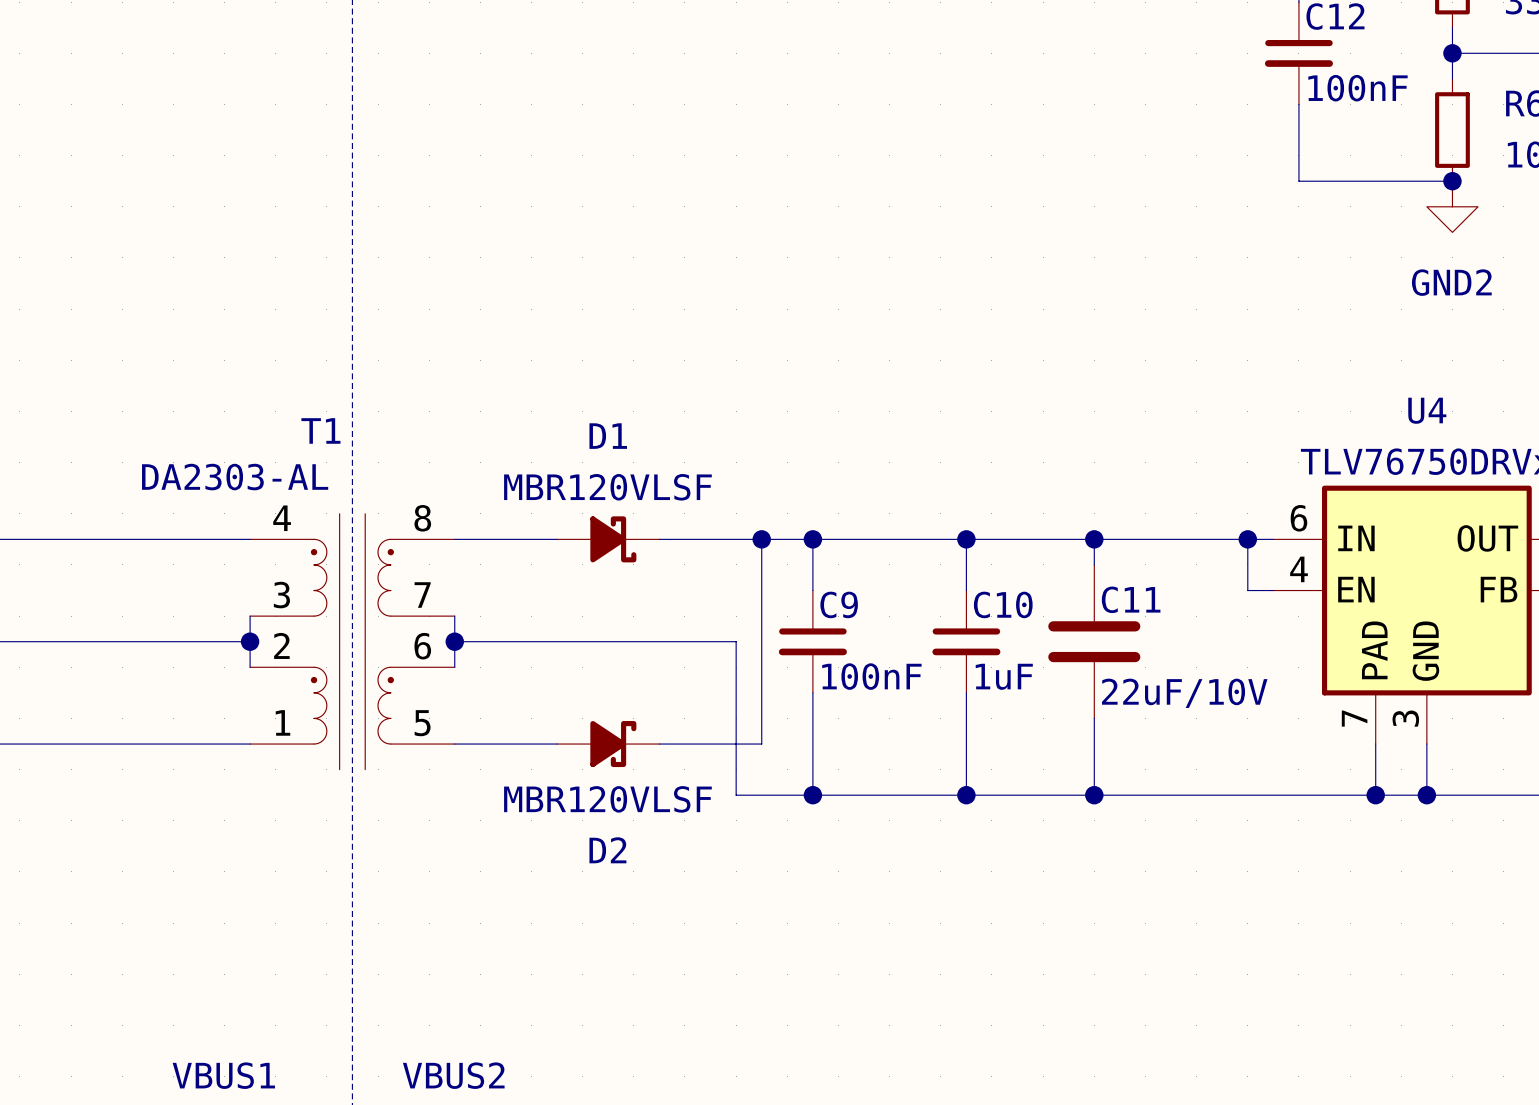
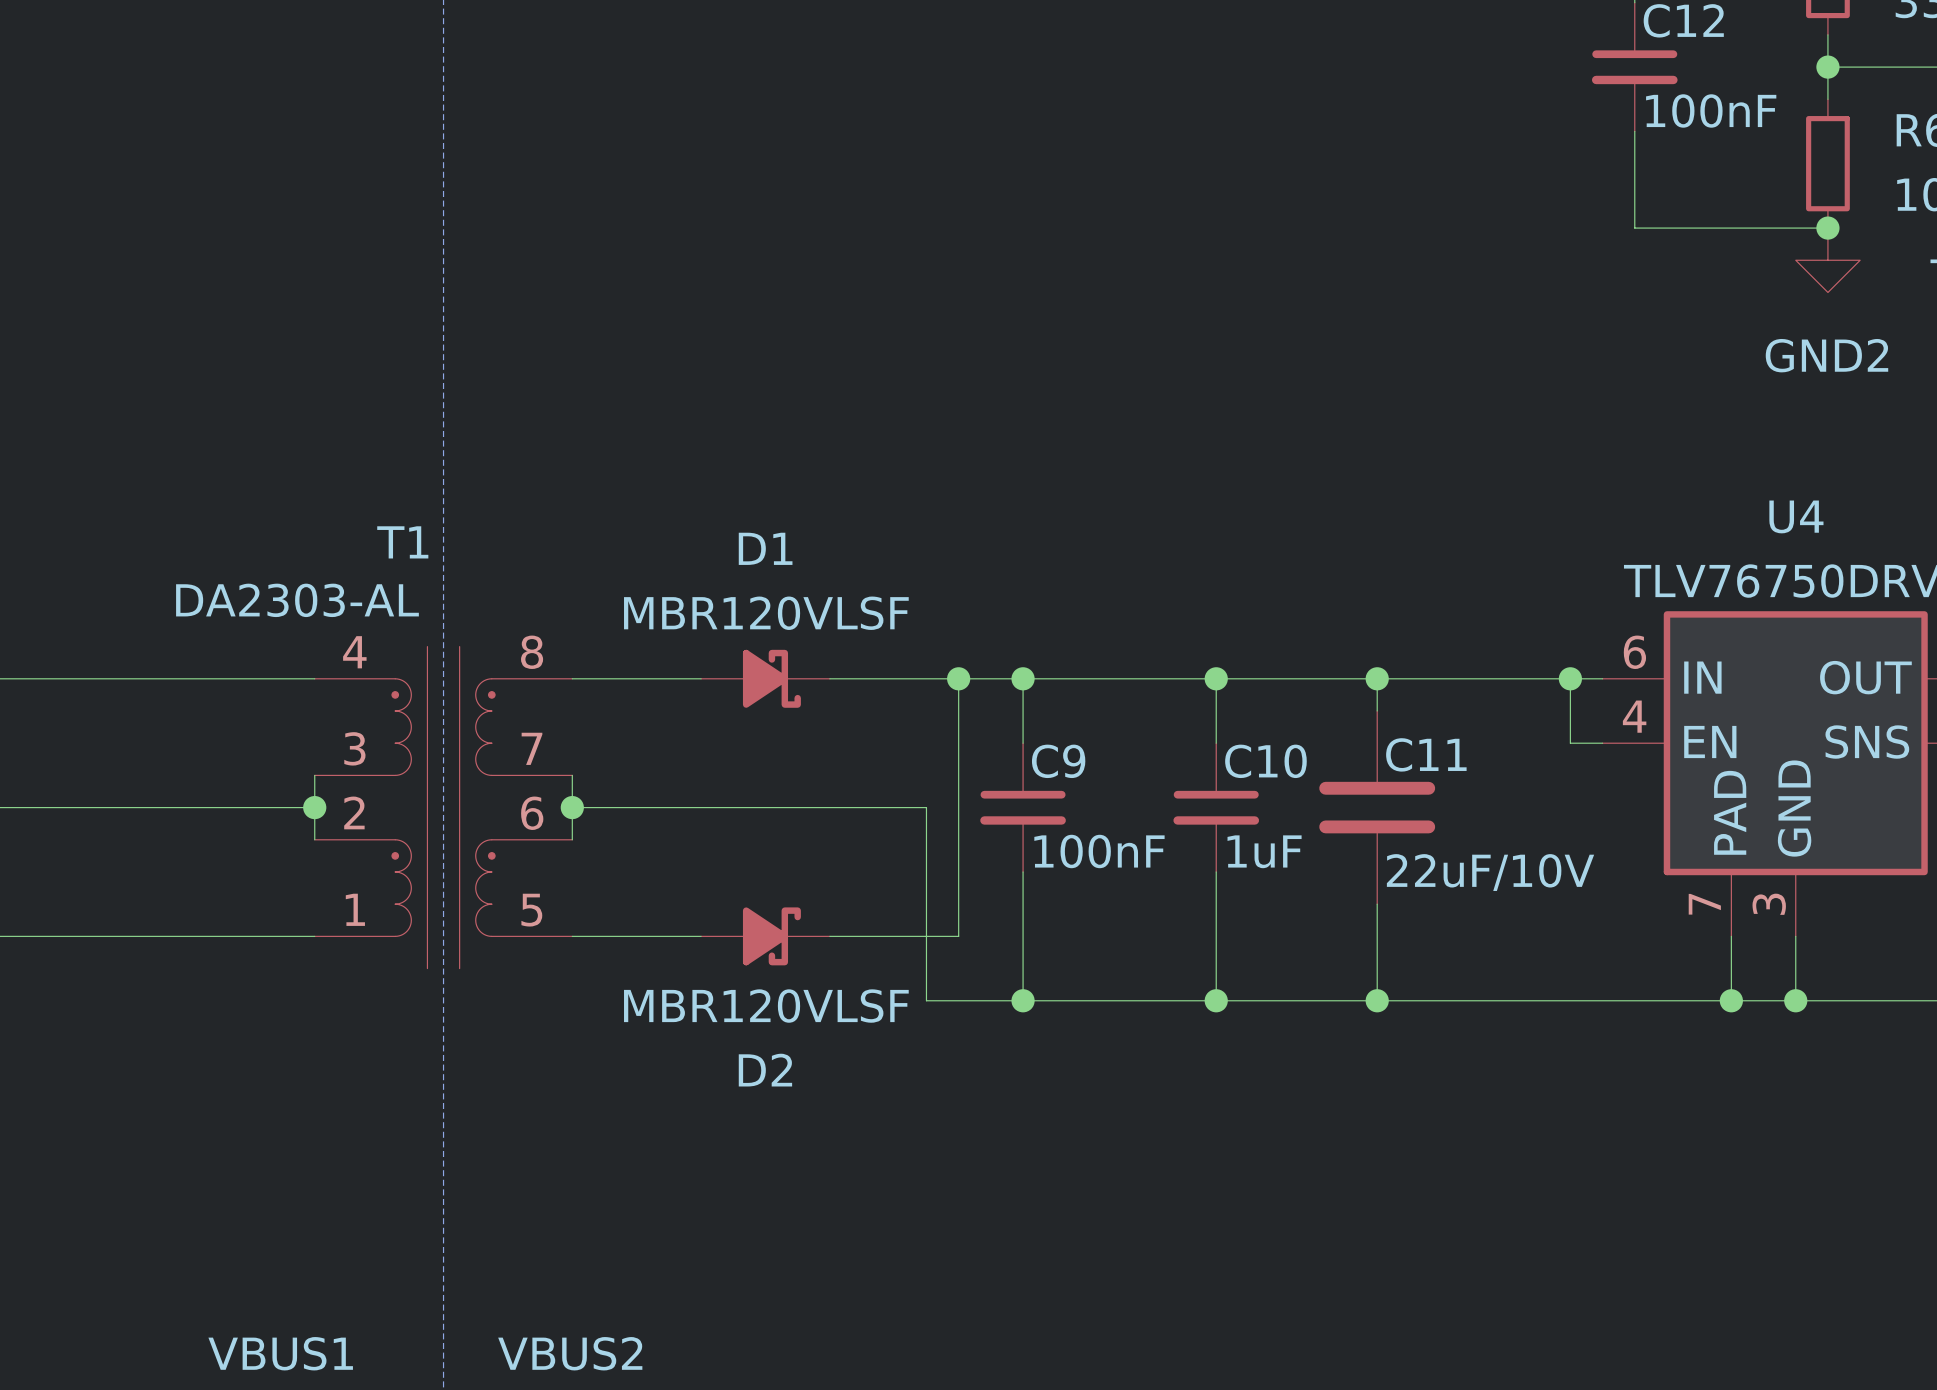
U4 pin name: FB (1499, 589) -> SNS (1867, 742)

